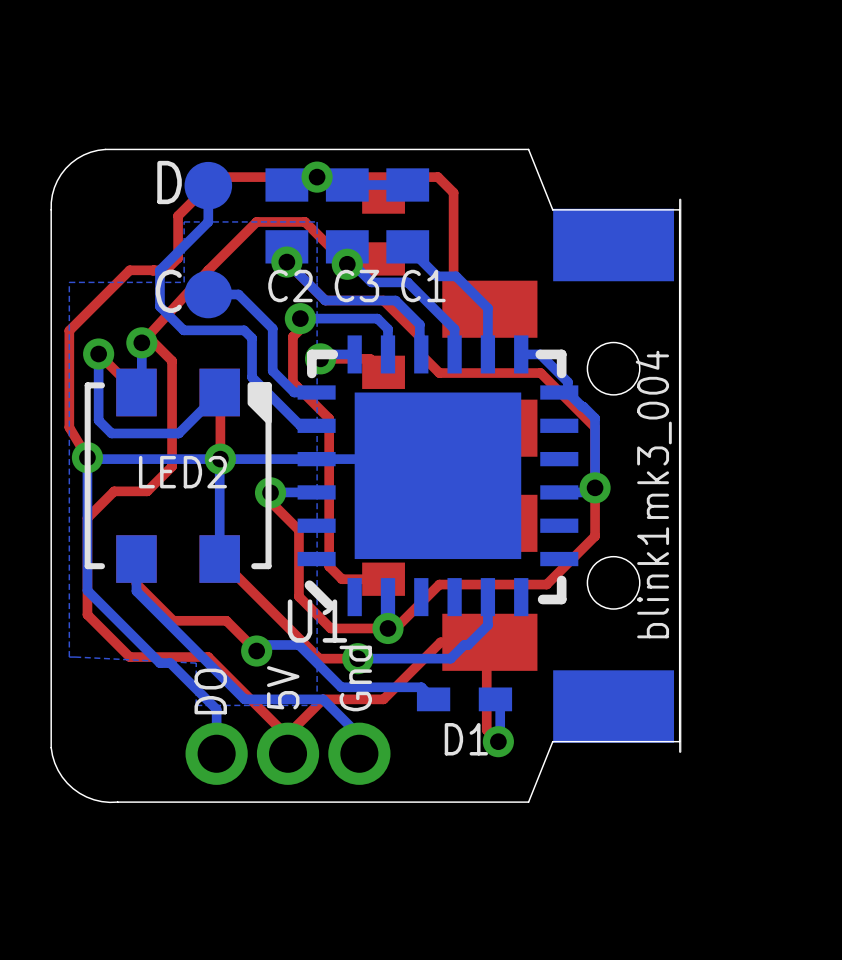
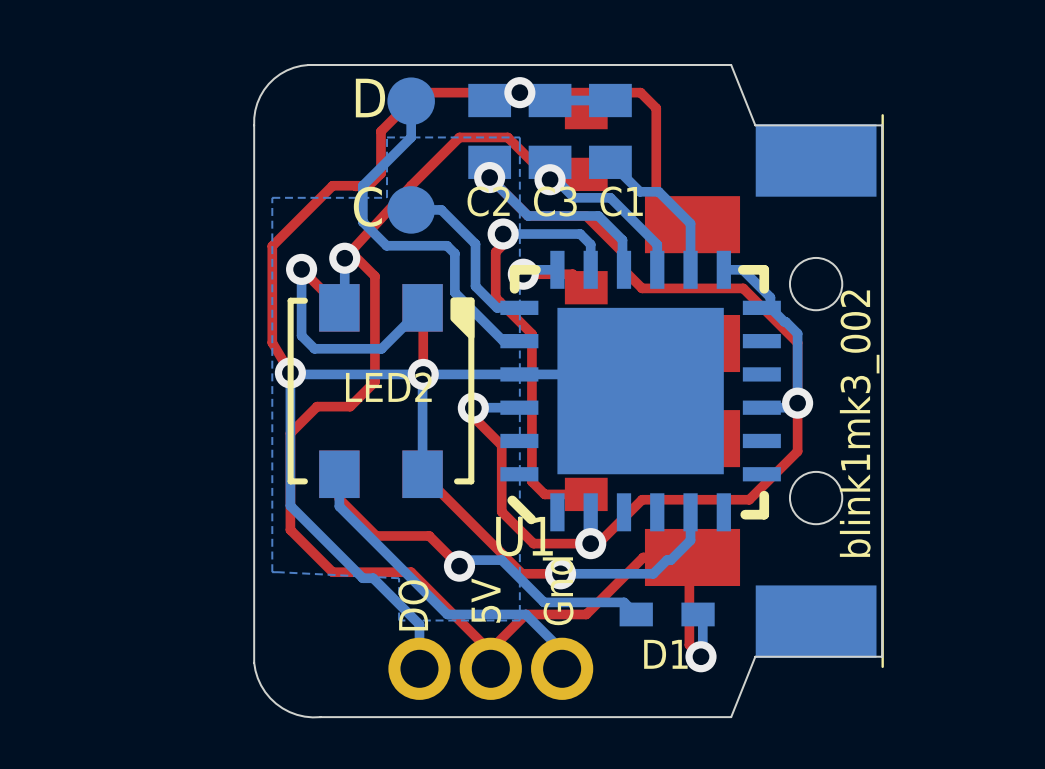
text: blink1mk3_004 (653, 494) -> blink1mk3_002 (859, 423)

